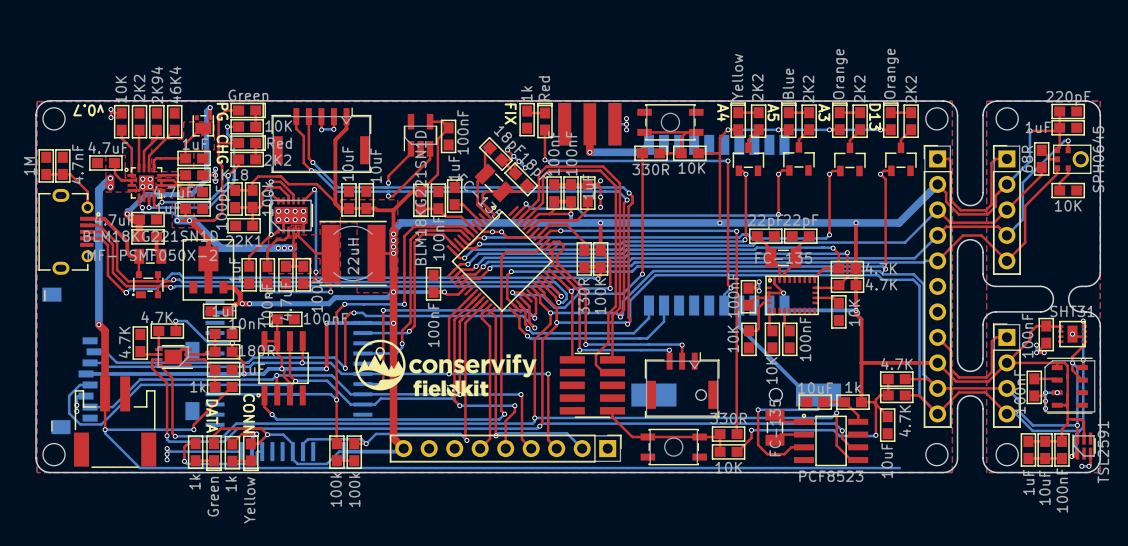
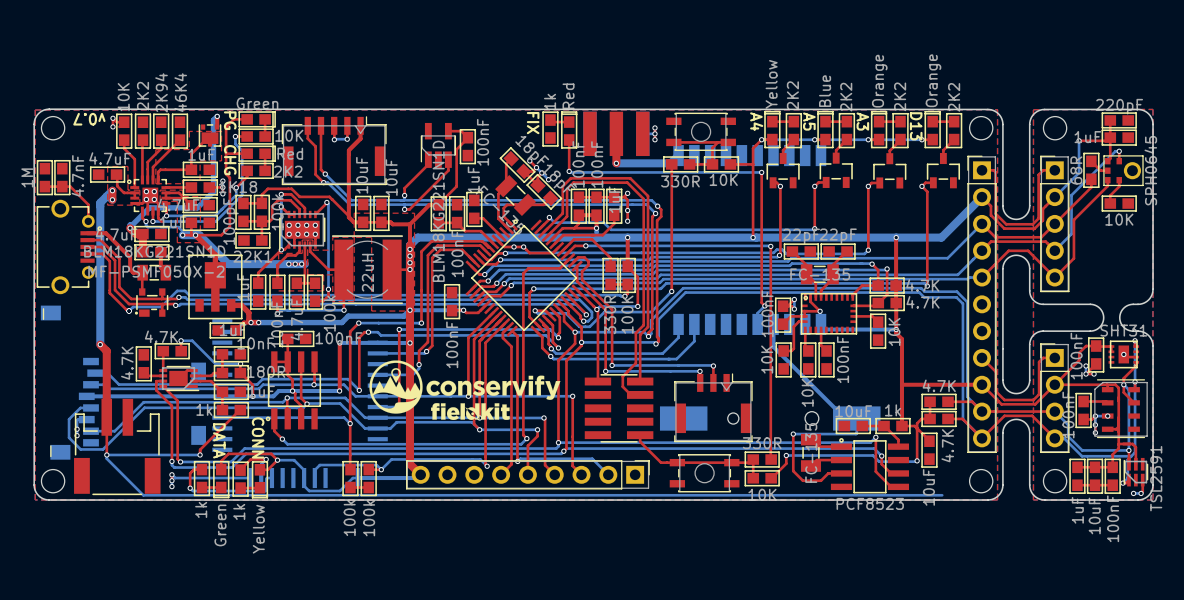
part footprint: [38, 188, 101, 275] -> [36, 199, 103, 295]

